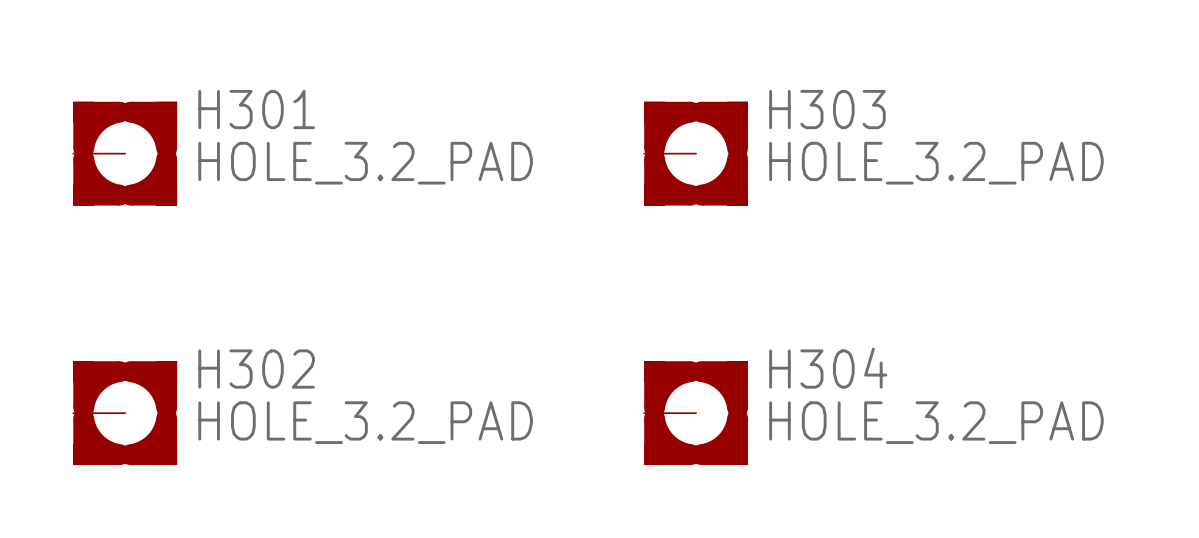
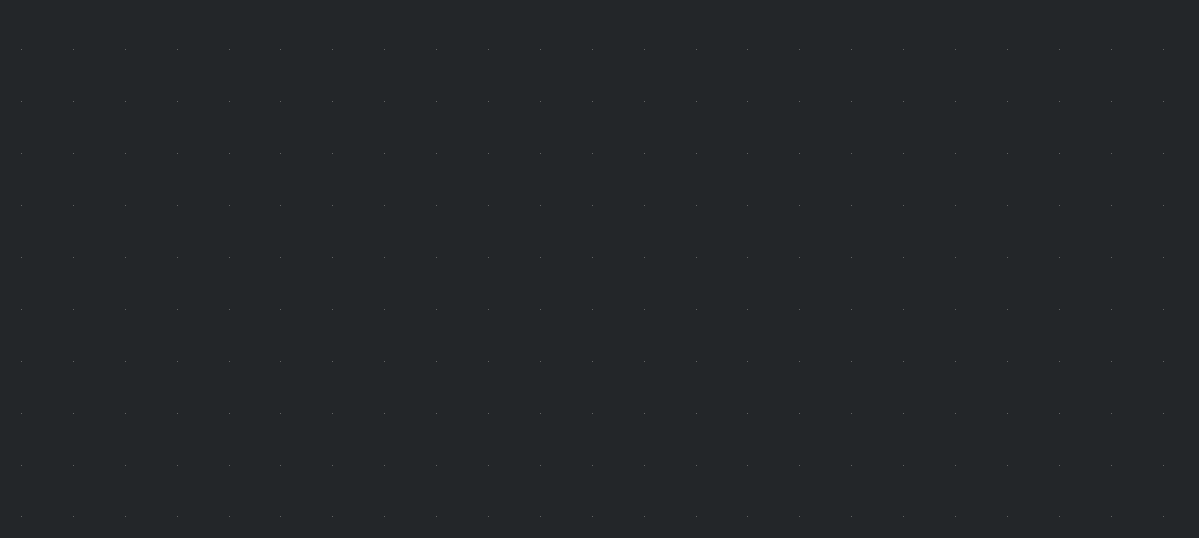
H301: HOLE_3.2_PAD (125, 153) -> none
H303: HOLE_3.2_PAD (696, 153) -> none
H302: HOLE_3.2_PAD (125, 413) -> none
H304: HOLE_3.2_PAD (696, 413) -> none

